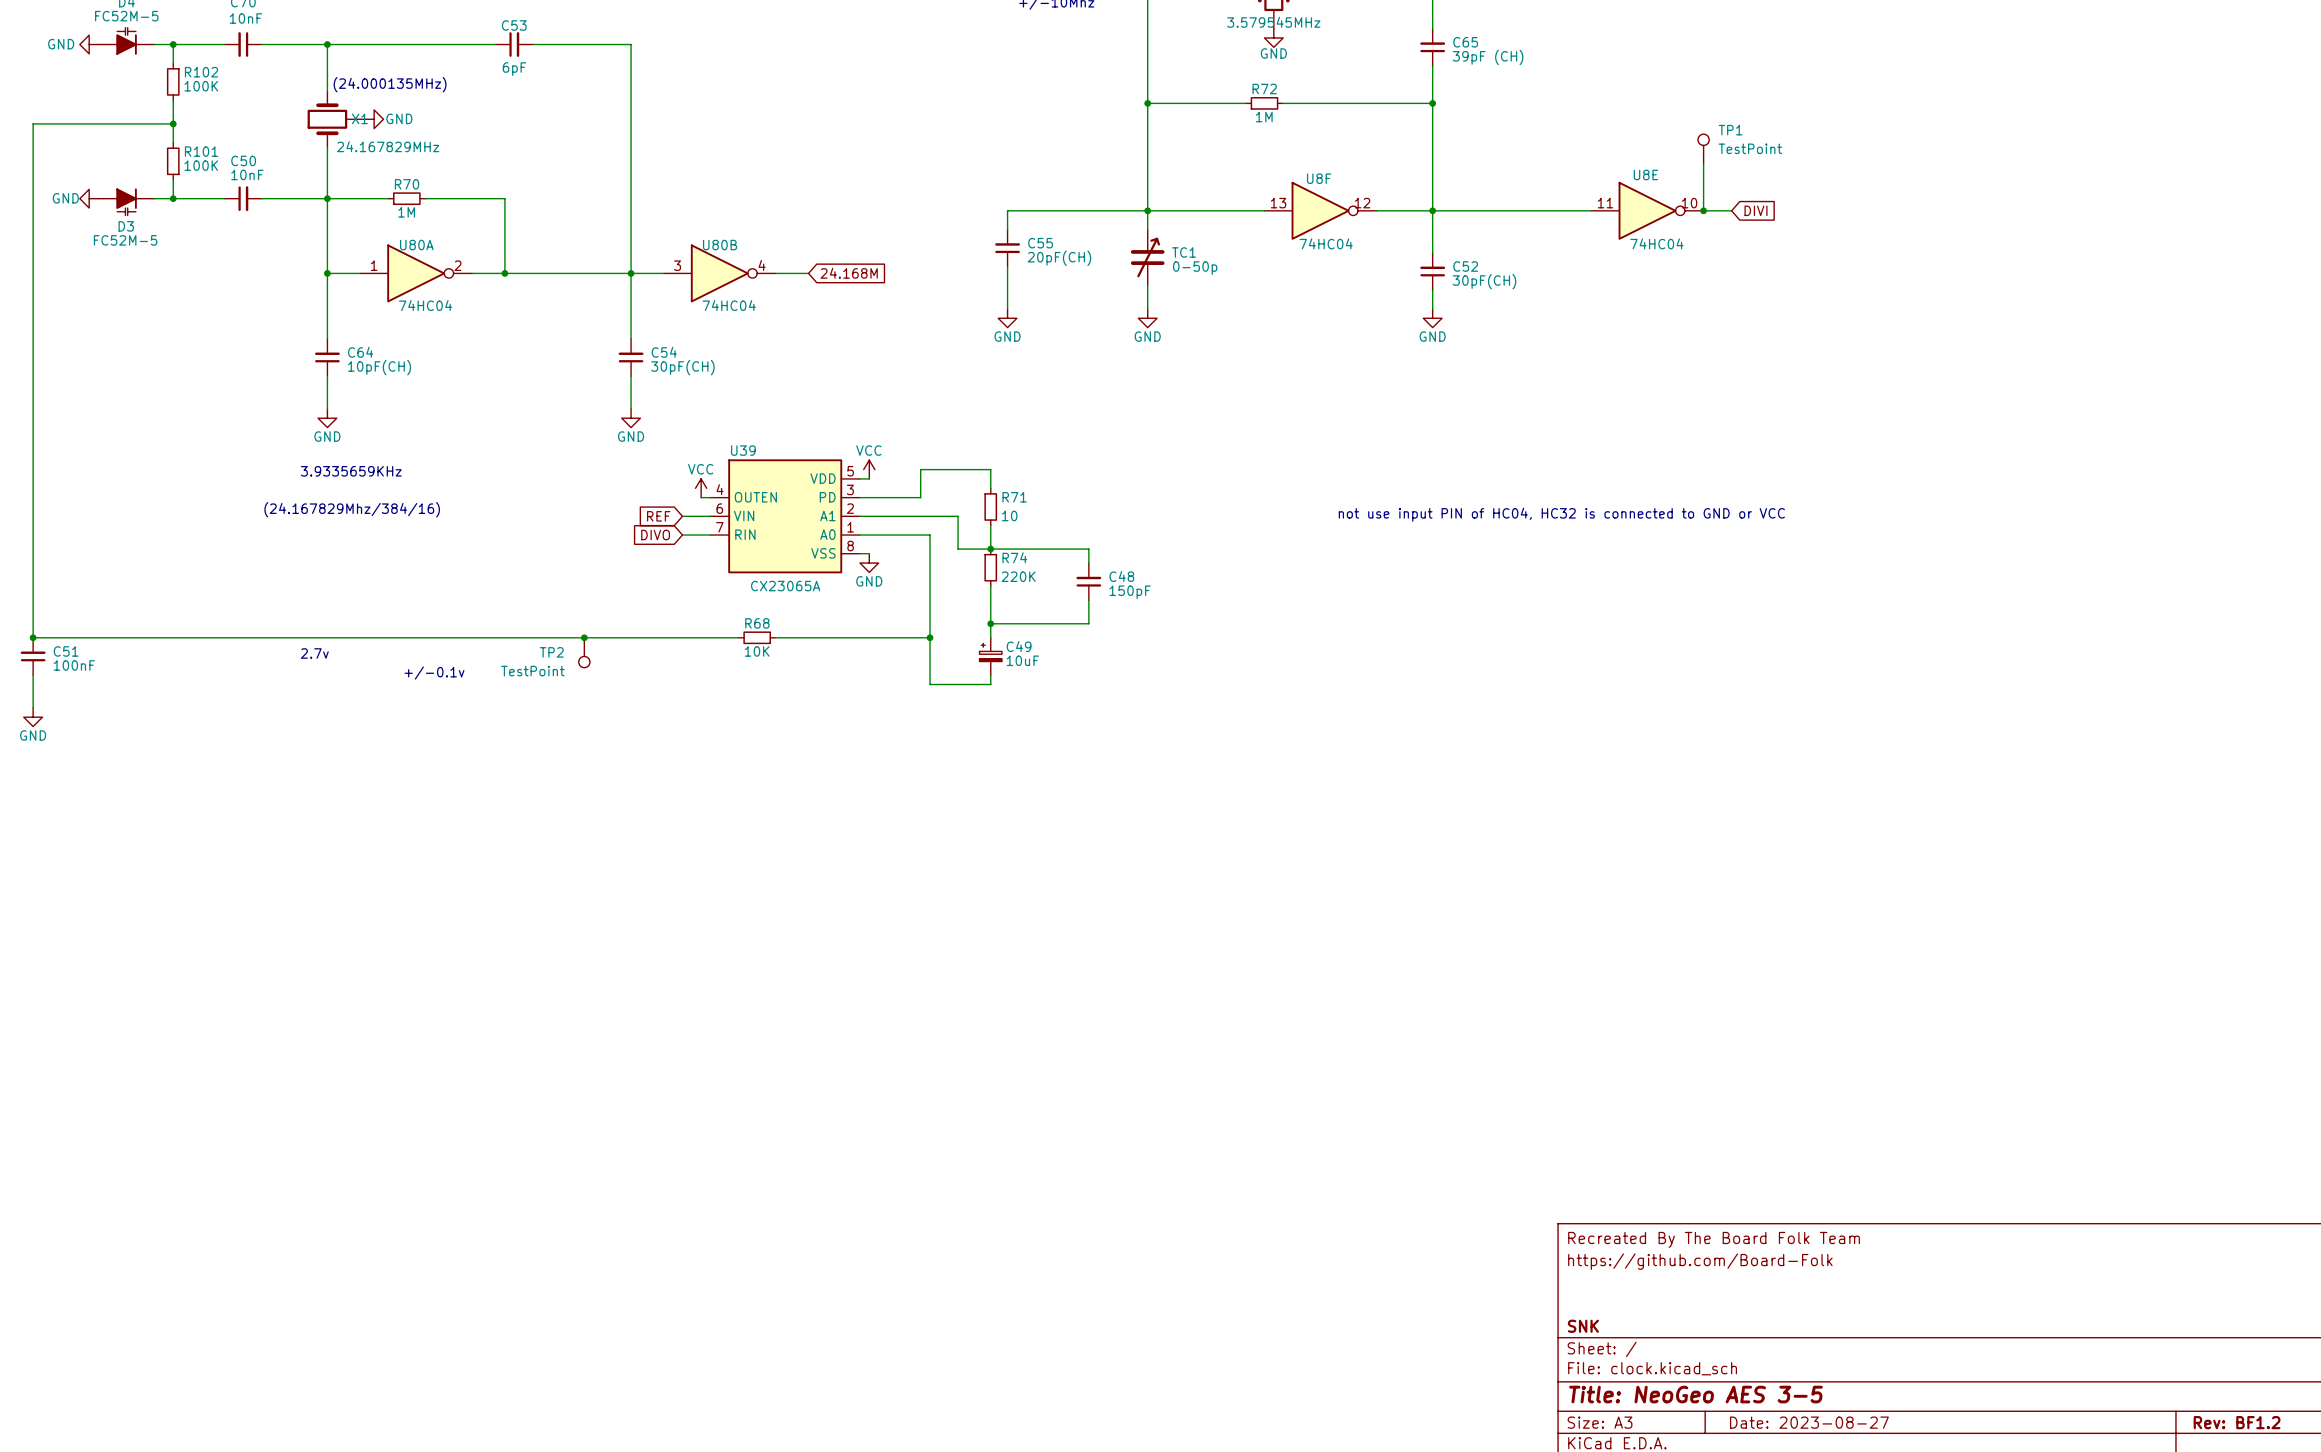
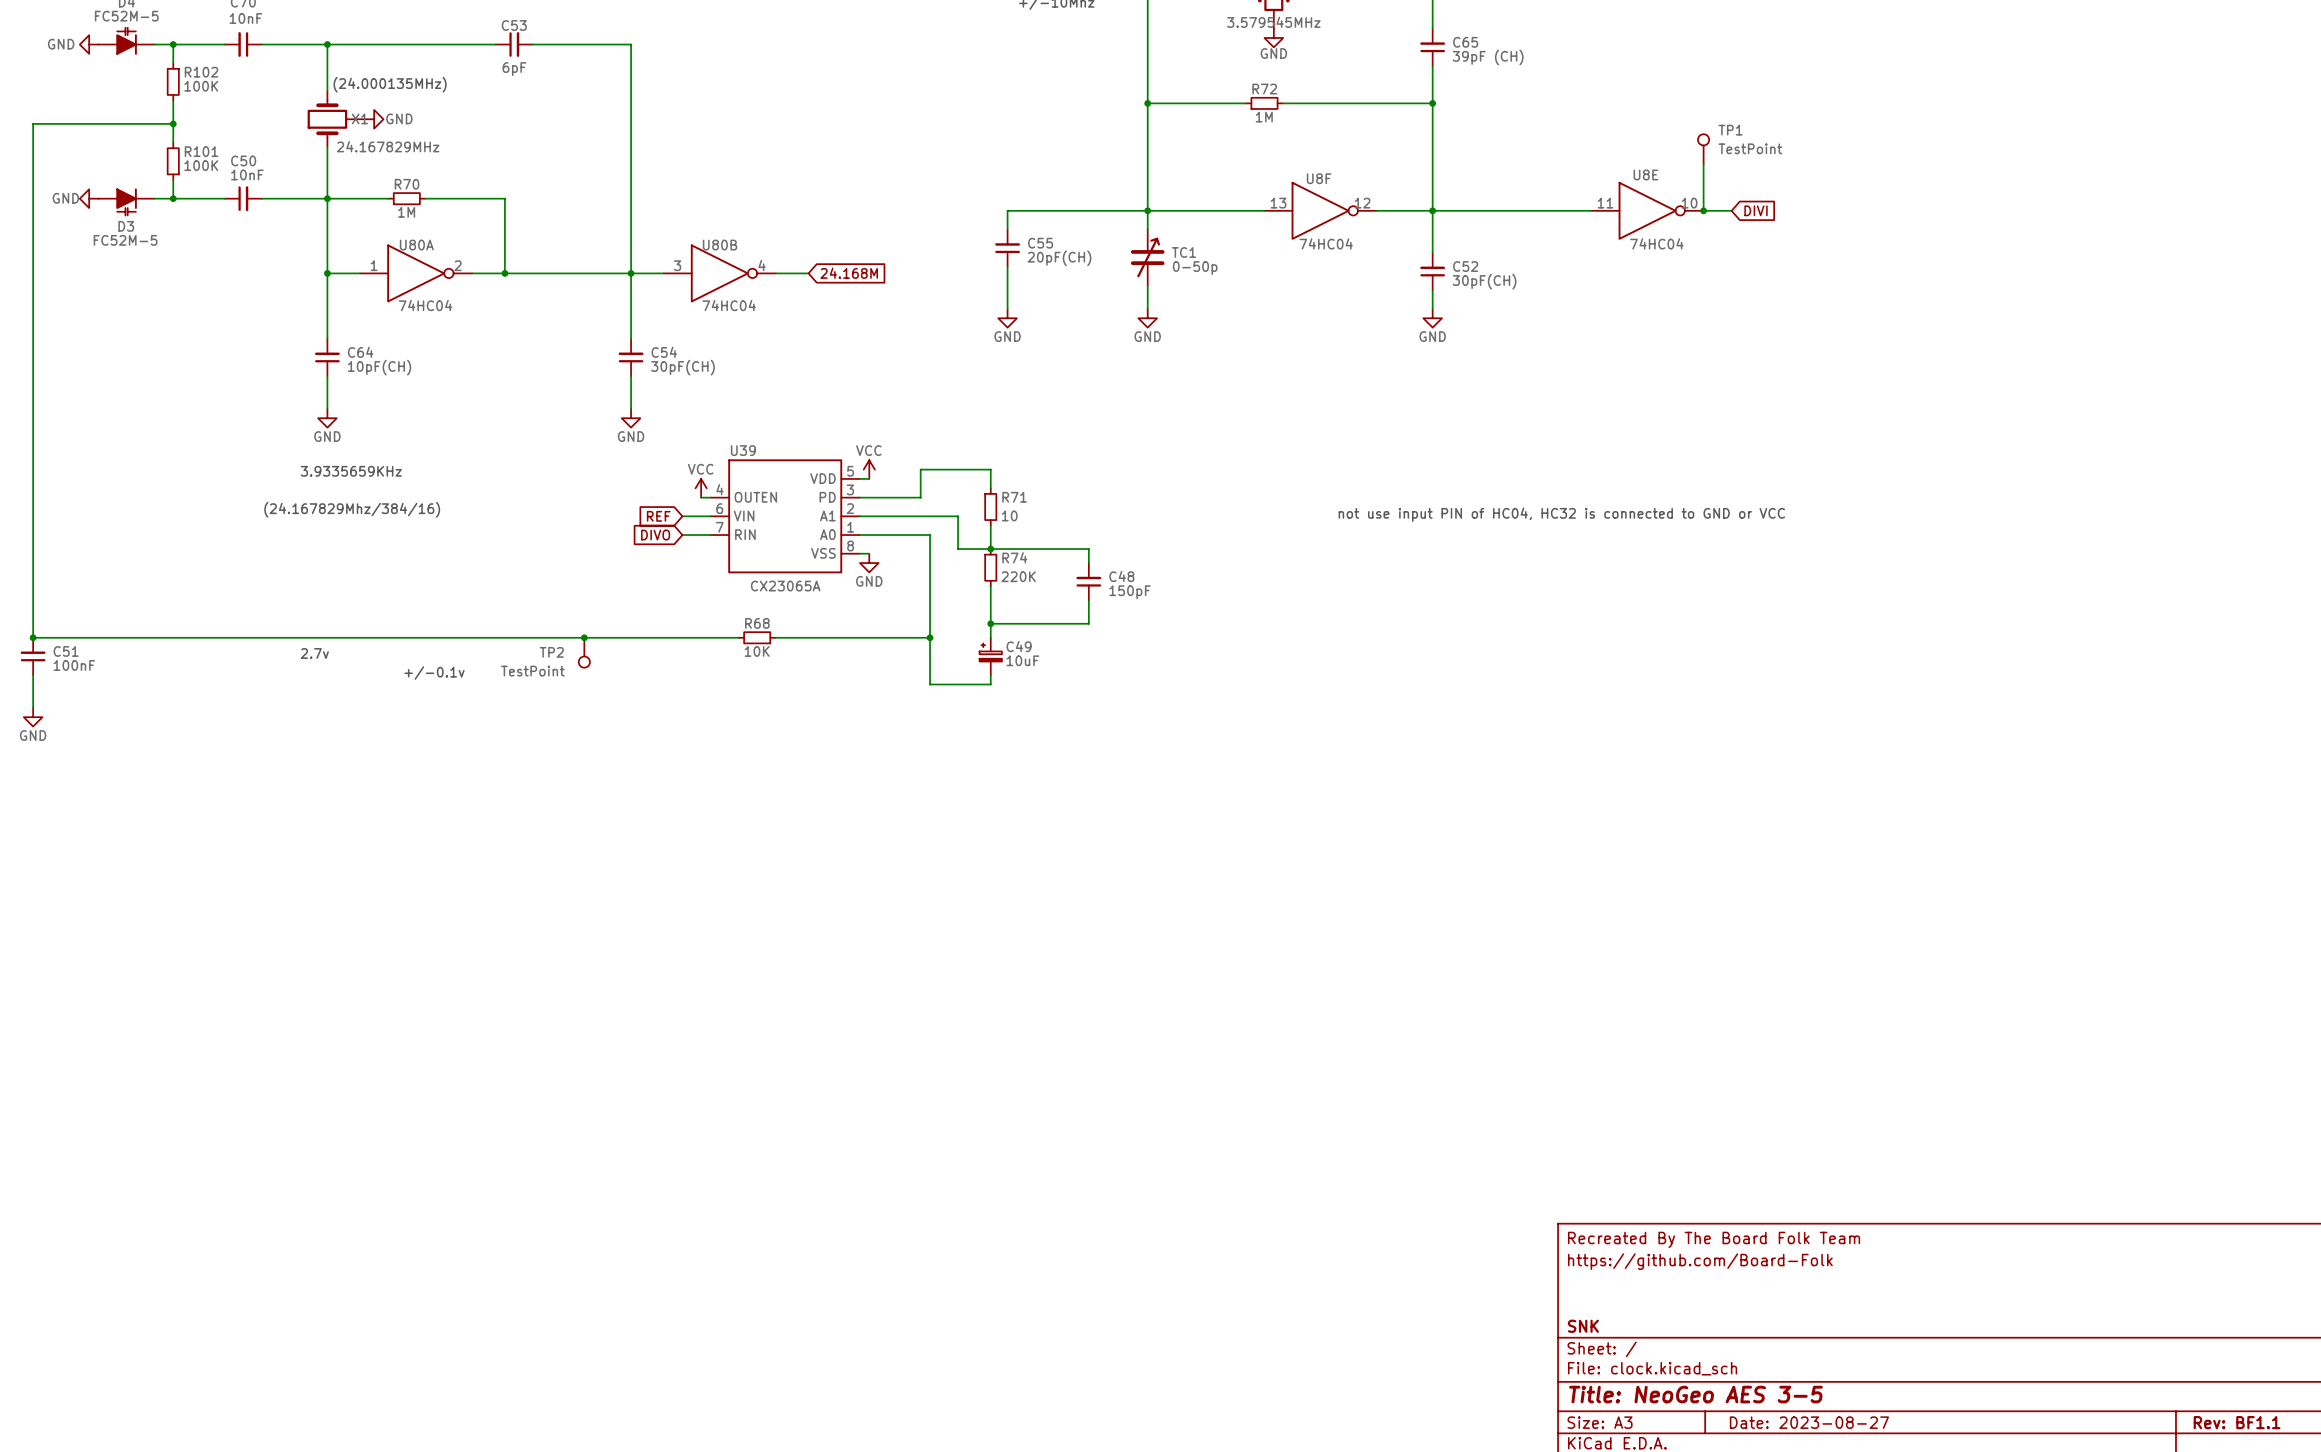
title block: Rev: BF1.2 (2237, 1422) -> Rev: BF1.1 (2237, 1422)

